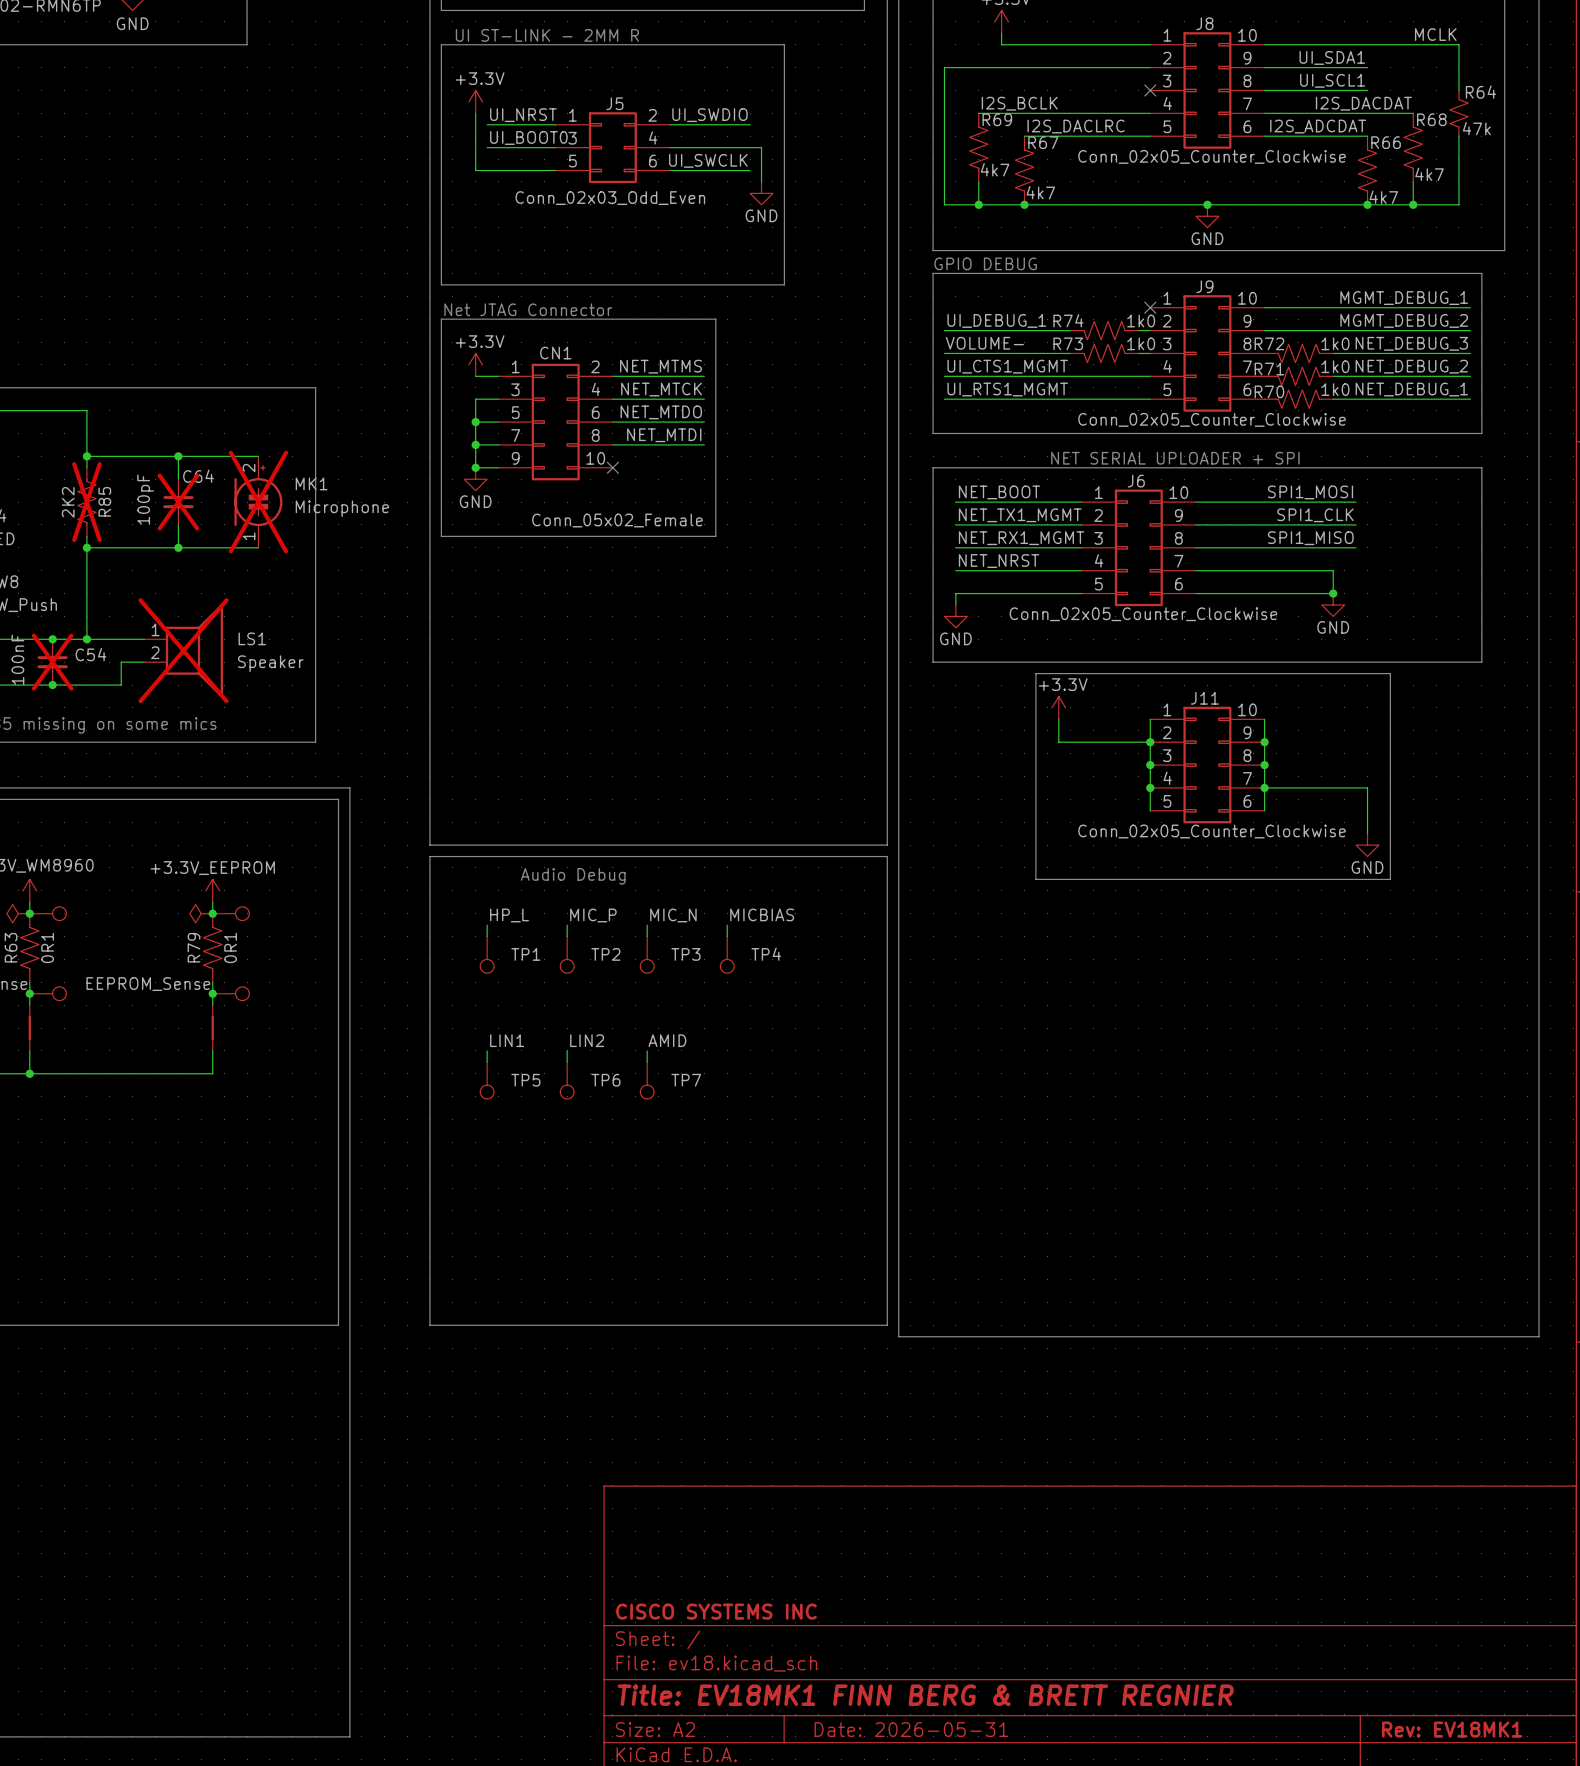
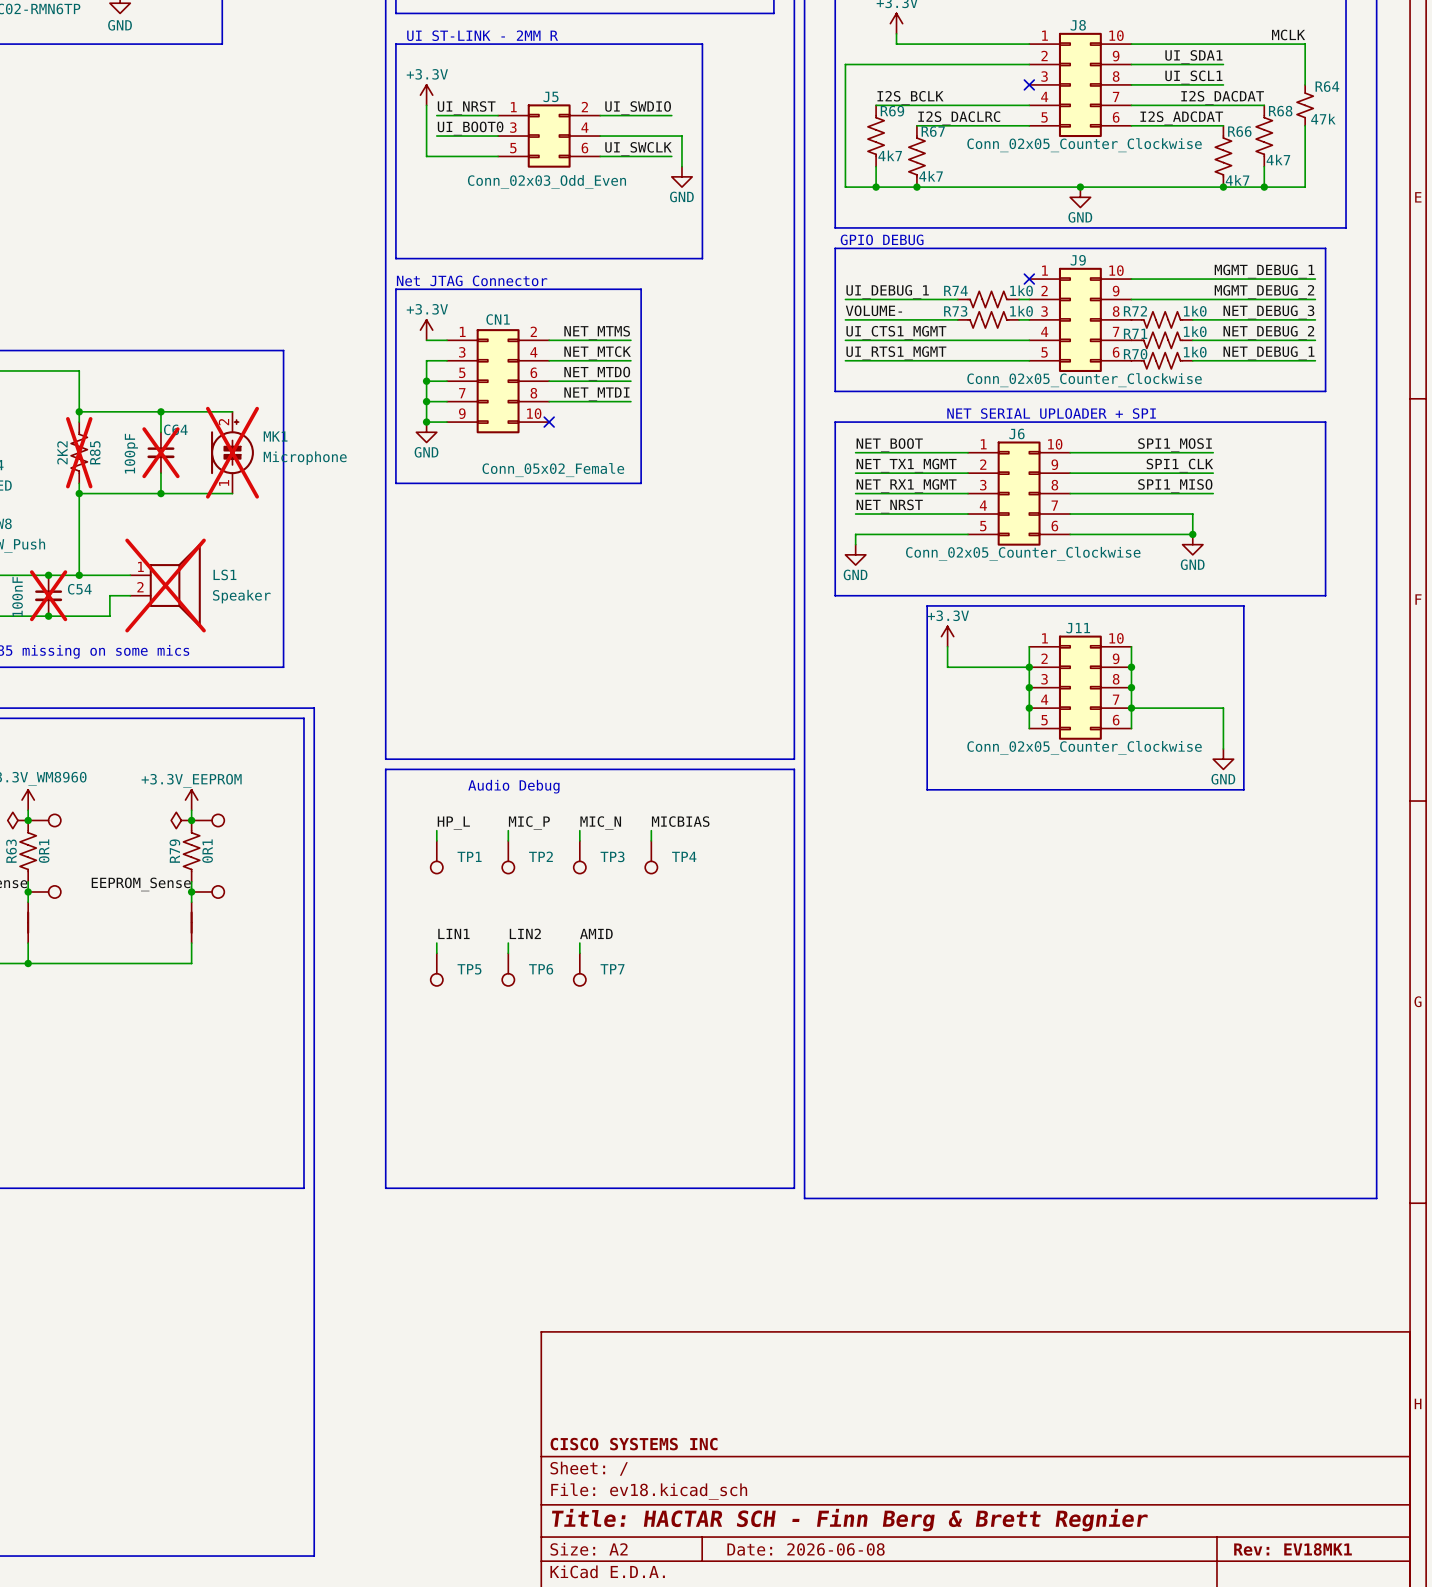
title block: Title: EV18MK1 FINN BERG & BRETT REGNIER (925, 1695) -> Title: HACTAR SCH - Finn Berg & Brett Regnier (849, 1520)
title block: Date: 2026-05-31 (911, 1729) -> Date: 2026-06-08 (806, 1549)

